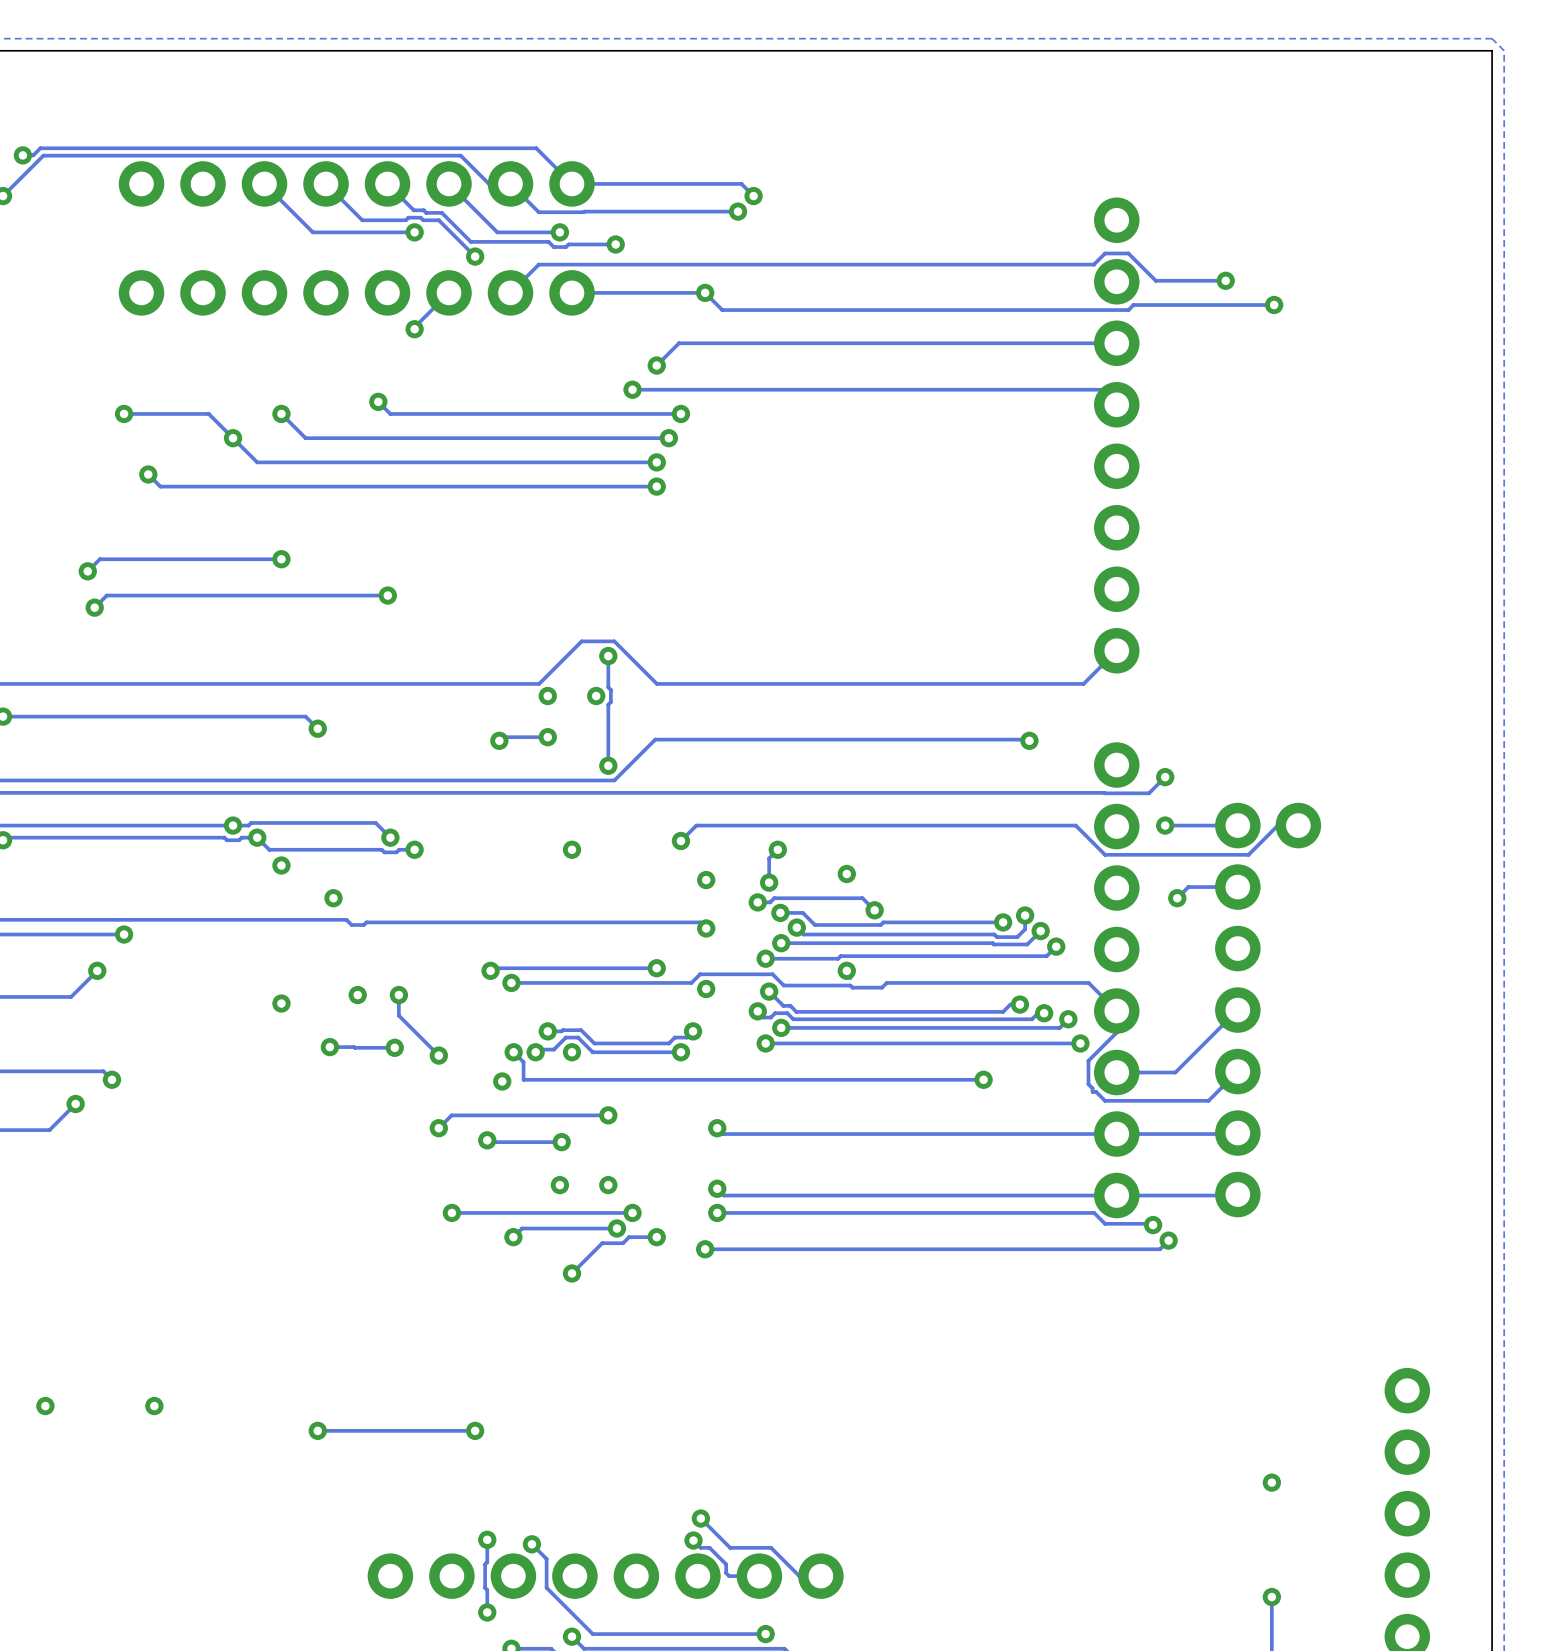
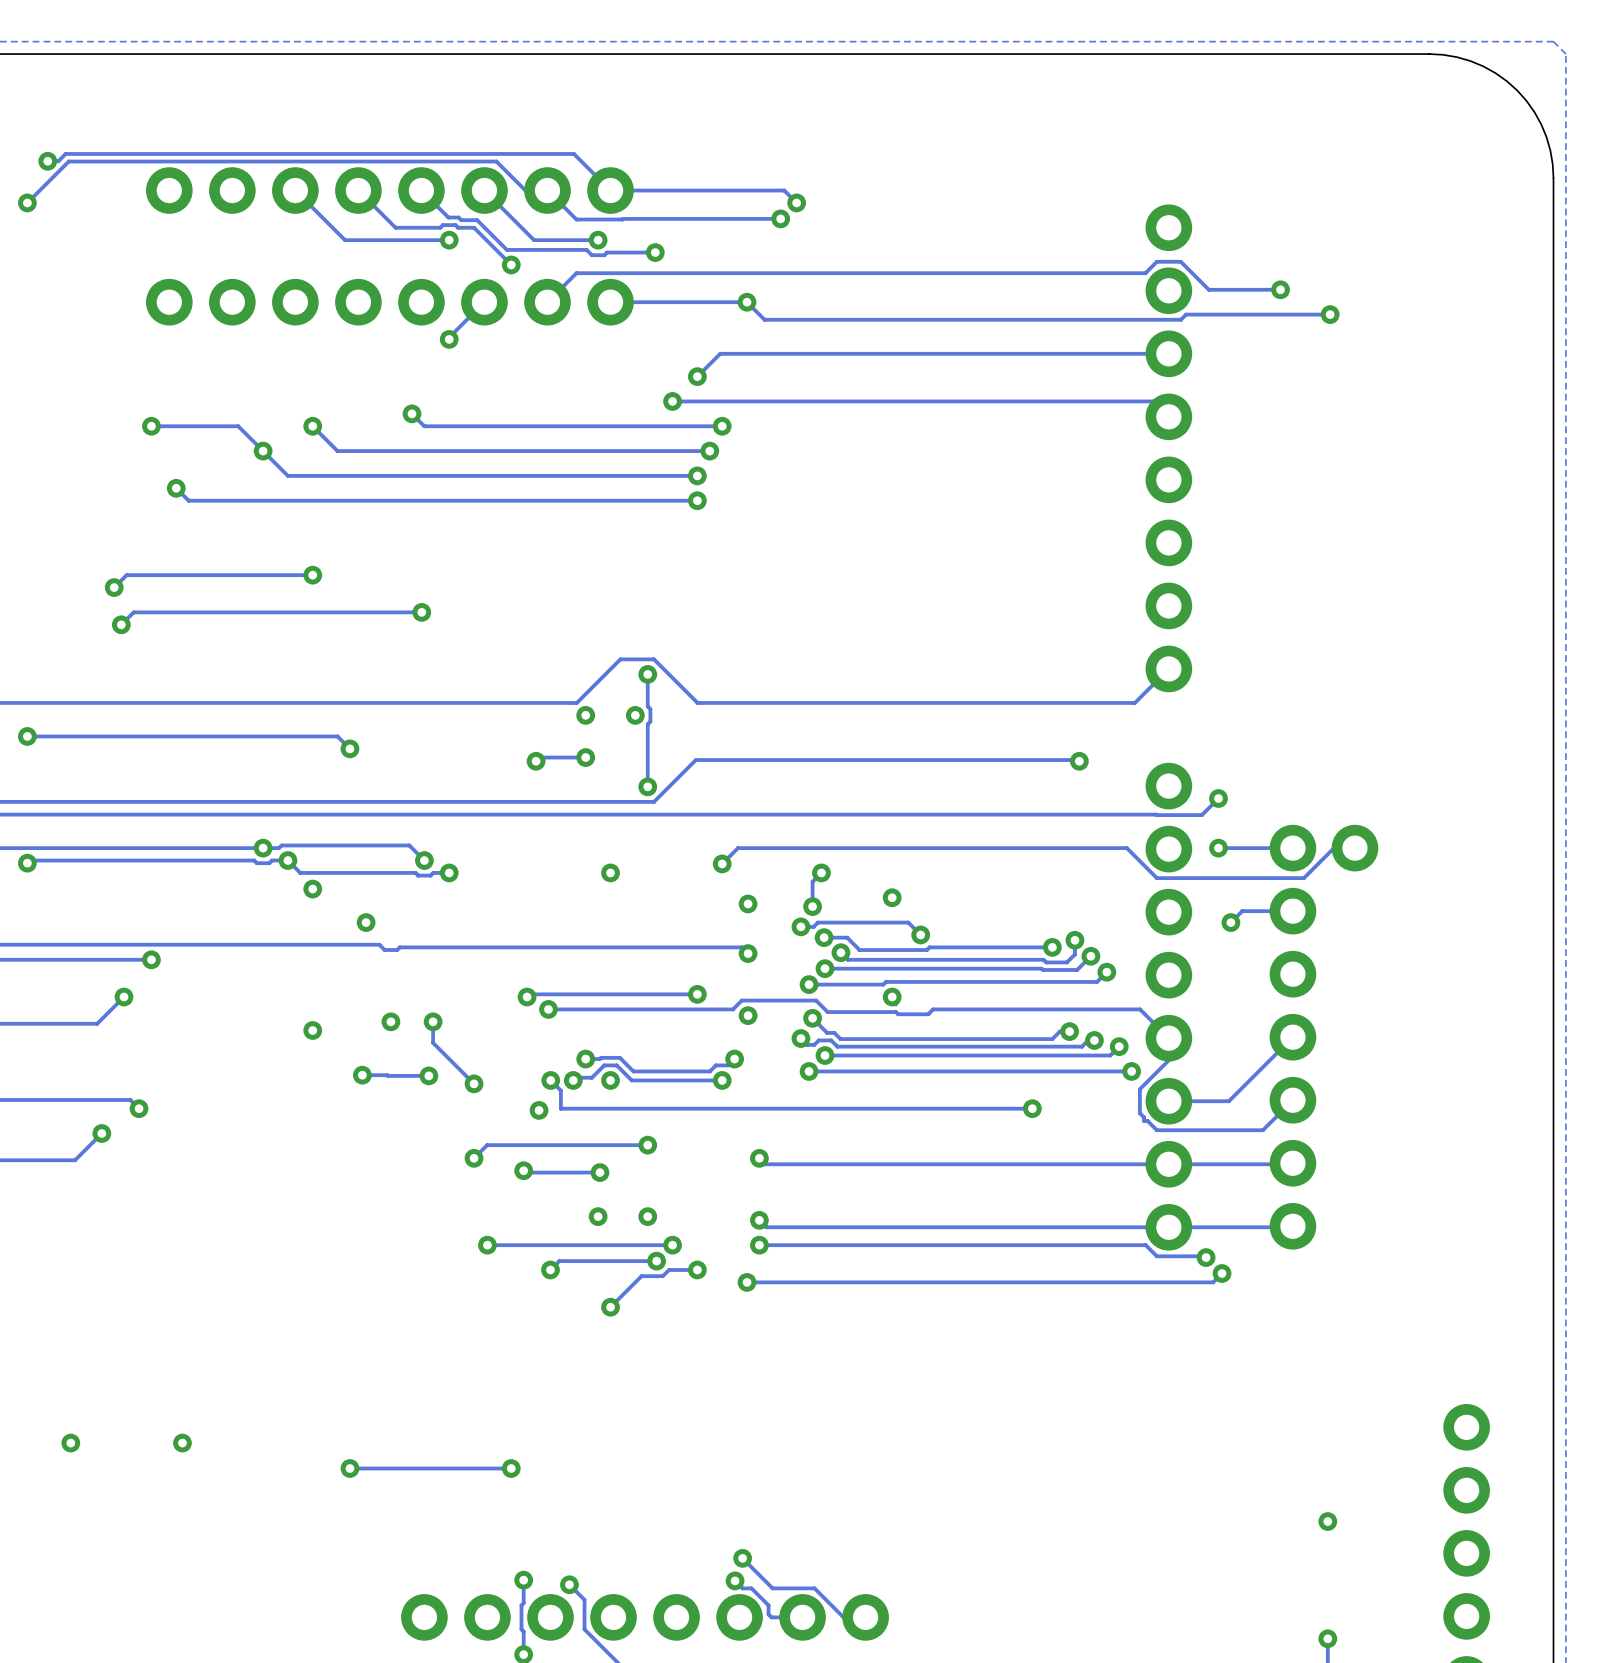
board edge: (1370, 50) (1492, 50) (1492, 171) -> (1429, 54) (1443, 54) (1470, 61) (1495, 73) (1517, 90) (1534, 112) (1546, 137) (1552, 164) (1553, 178)

